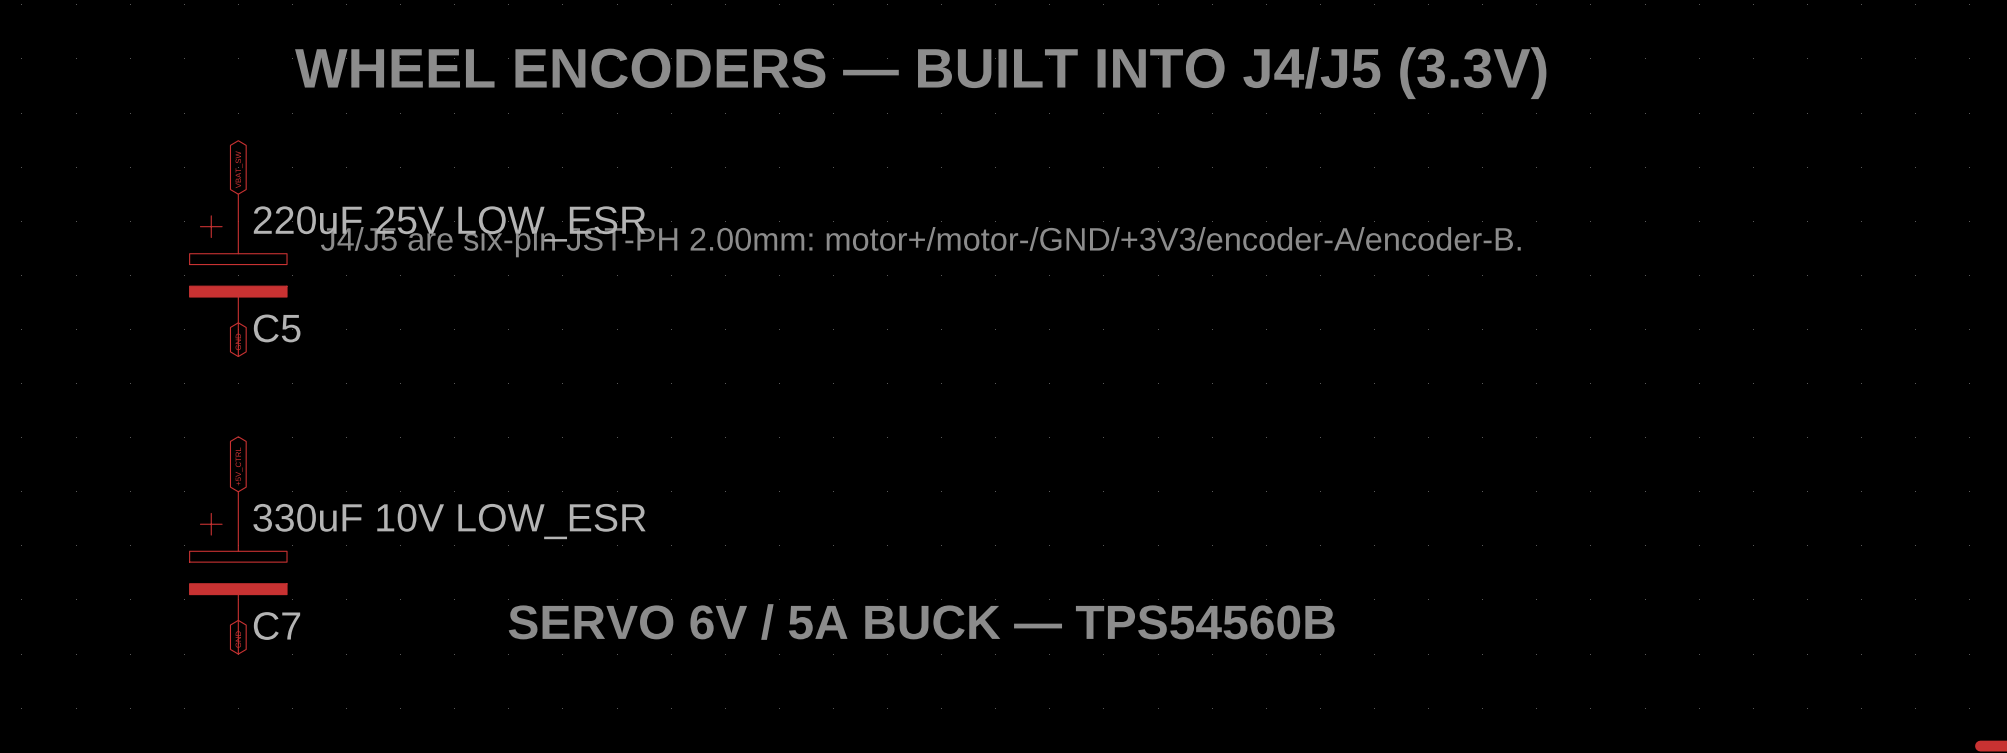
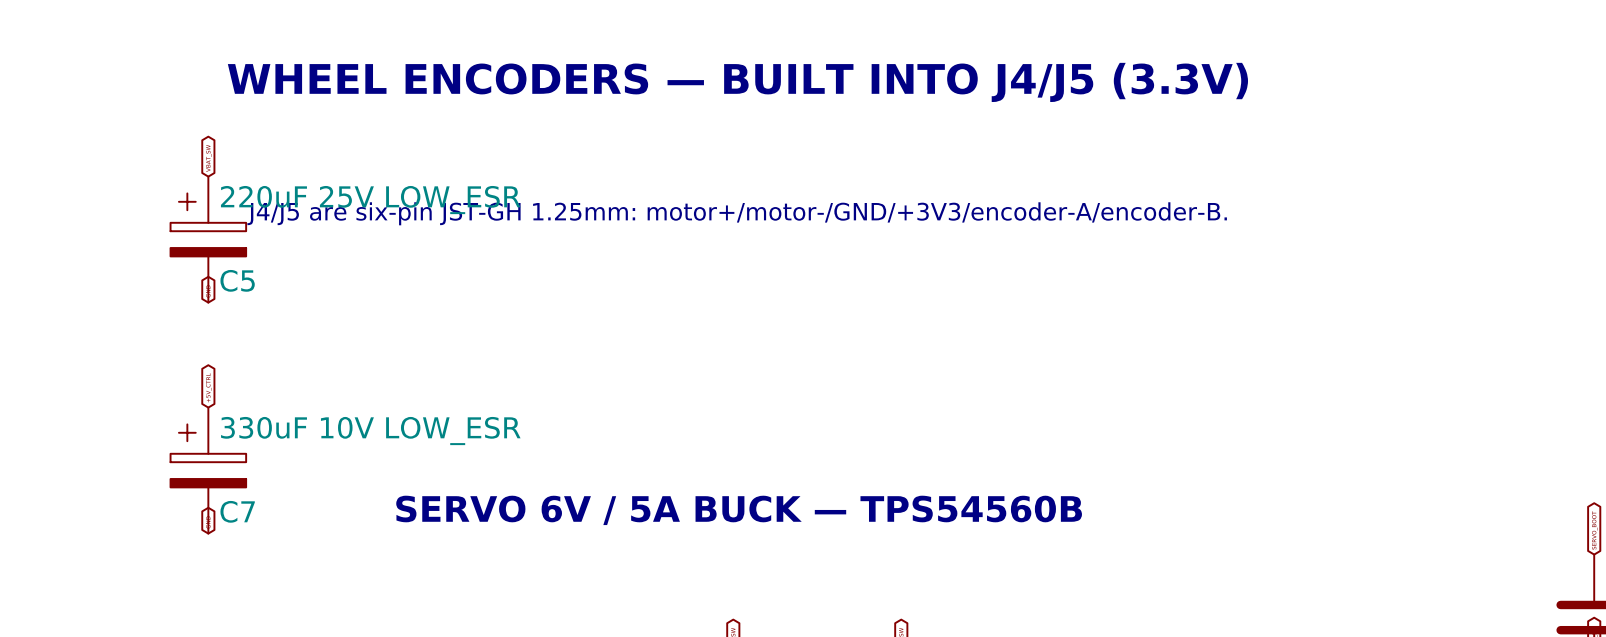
text: J4/J5 are six-pin JST-PH 2.00mm: motor+/motor-/GND/+3V3/encoder-A/encoder-B. (920, 242) -> J4/J5 are six-pin JST-GH 1.25mm: motor+/motor-/GND/+3V3/encoder-A/encoder-B. (737, 213)

